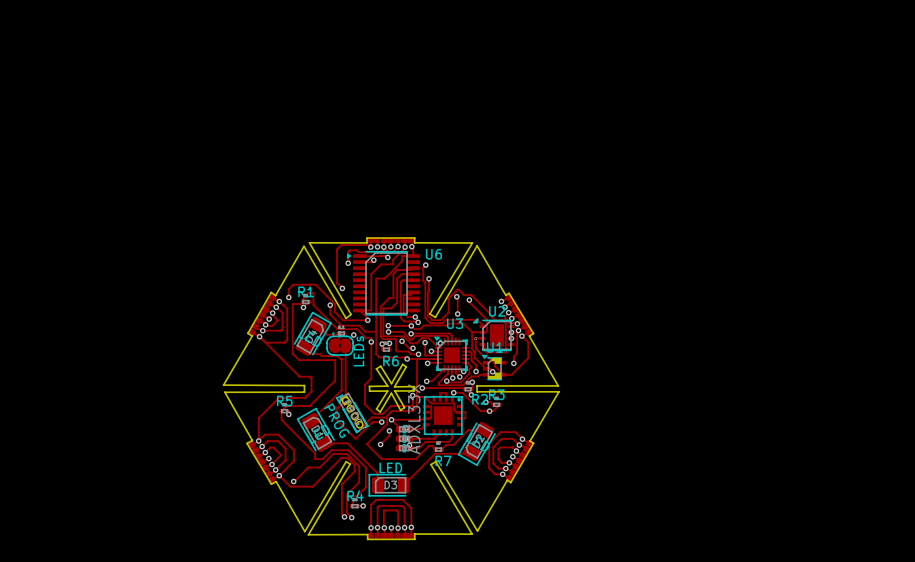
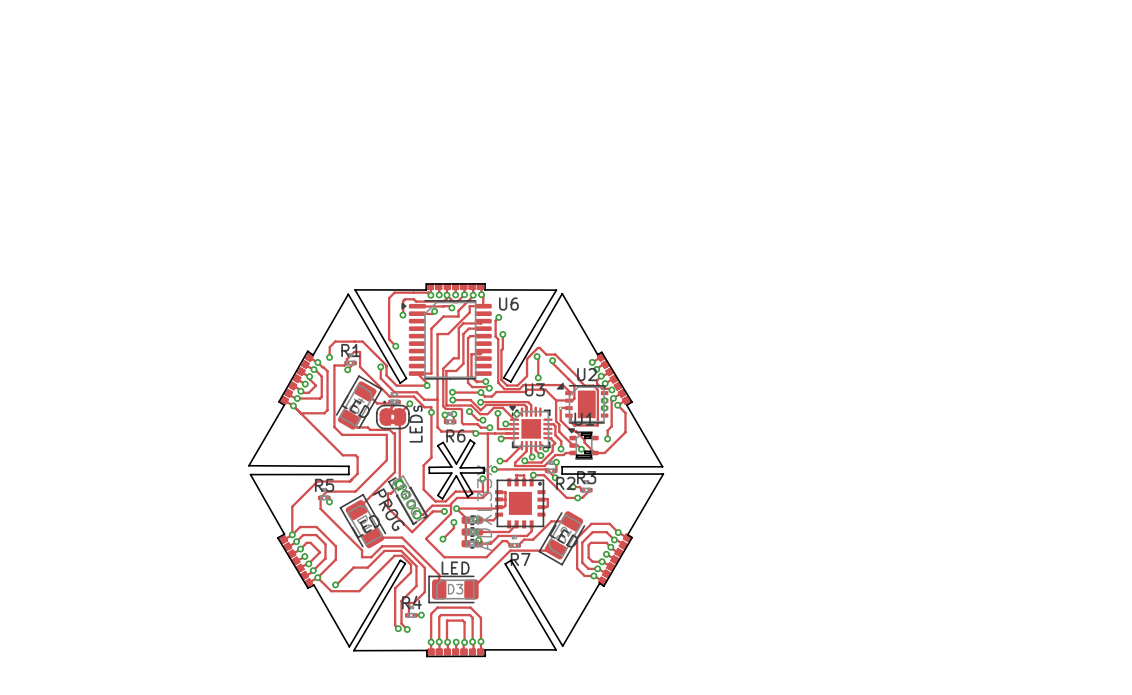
track: (416, 396) (424, 396) (431, 403) (454, 404) -> none
track: (454, 404) (454, 410) (460, 412) -> none

